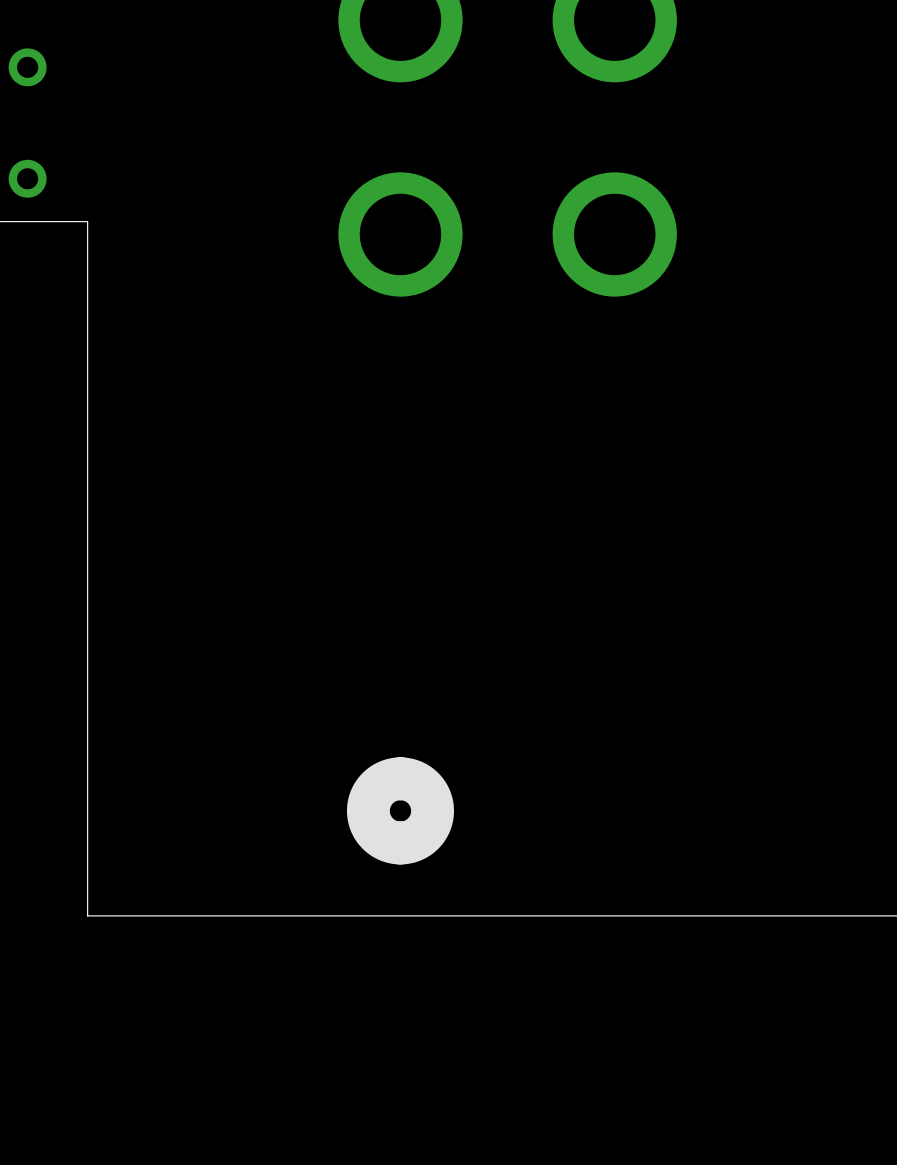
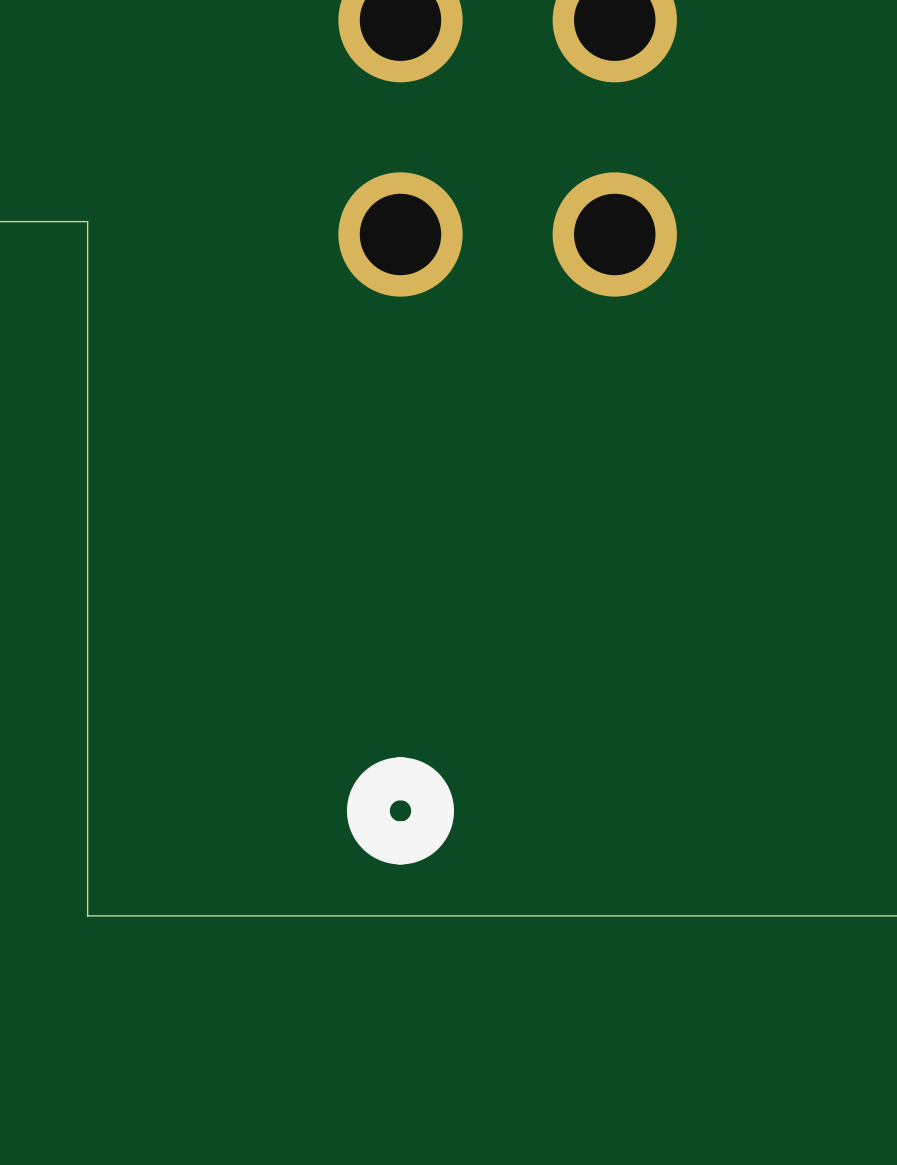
via: (27, 67) -> none
via: (27, 178) -> none

